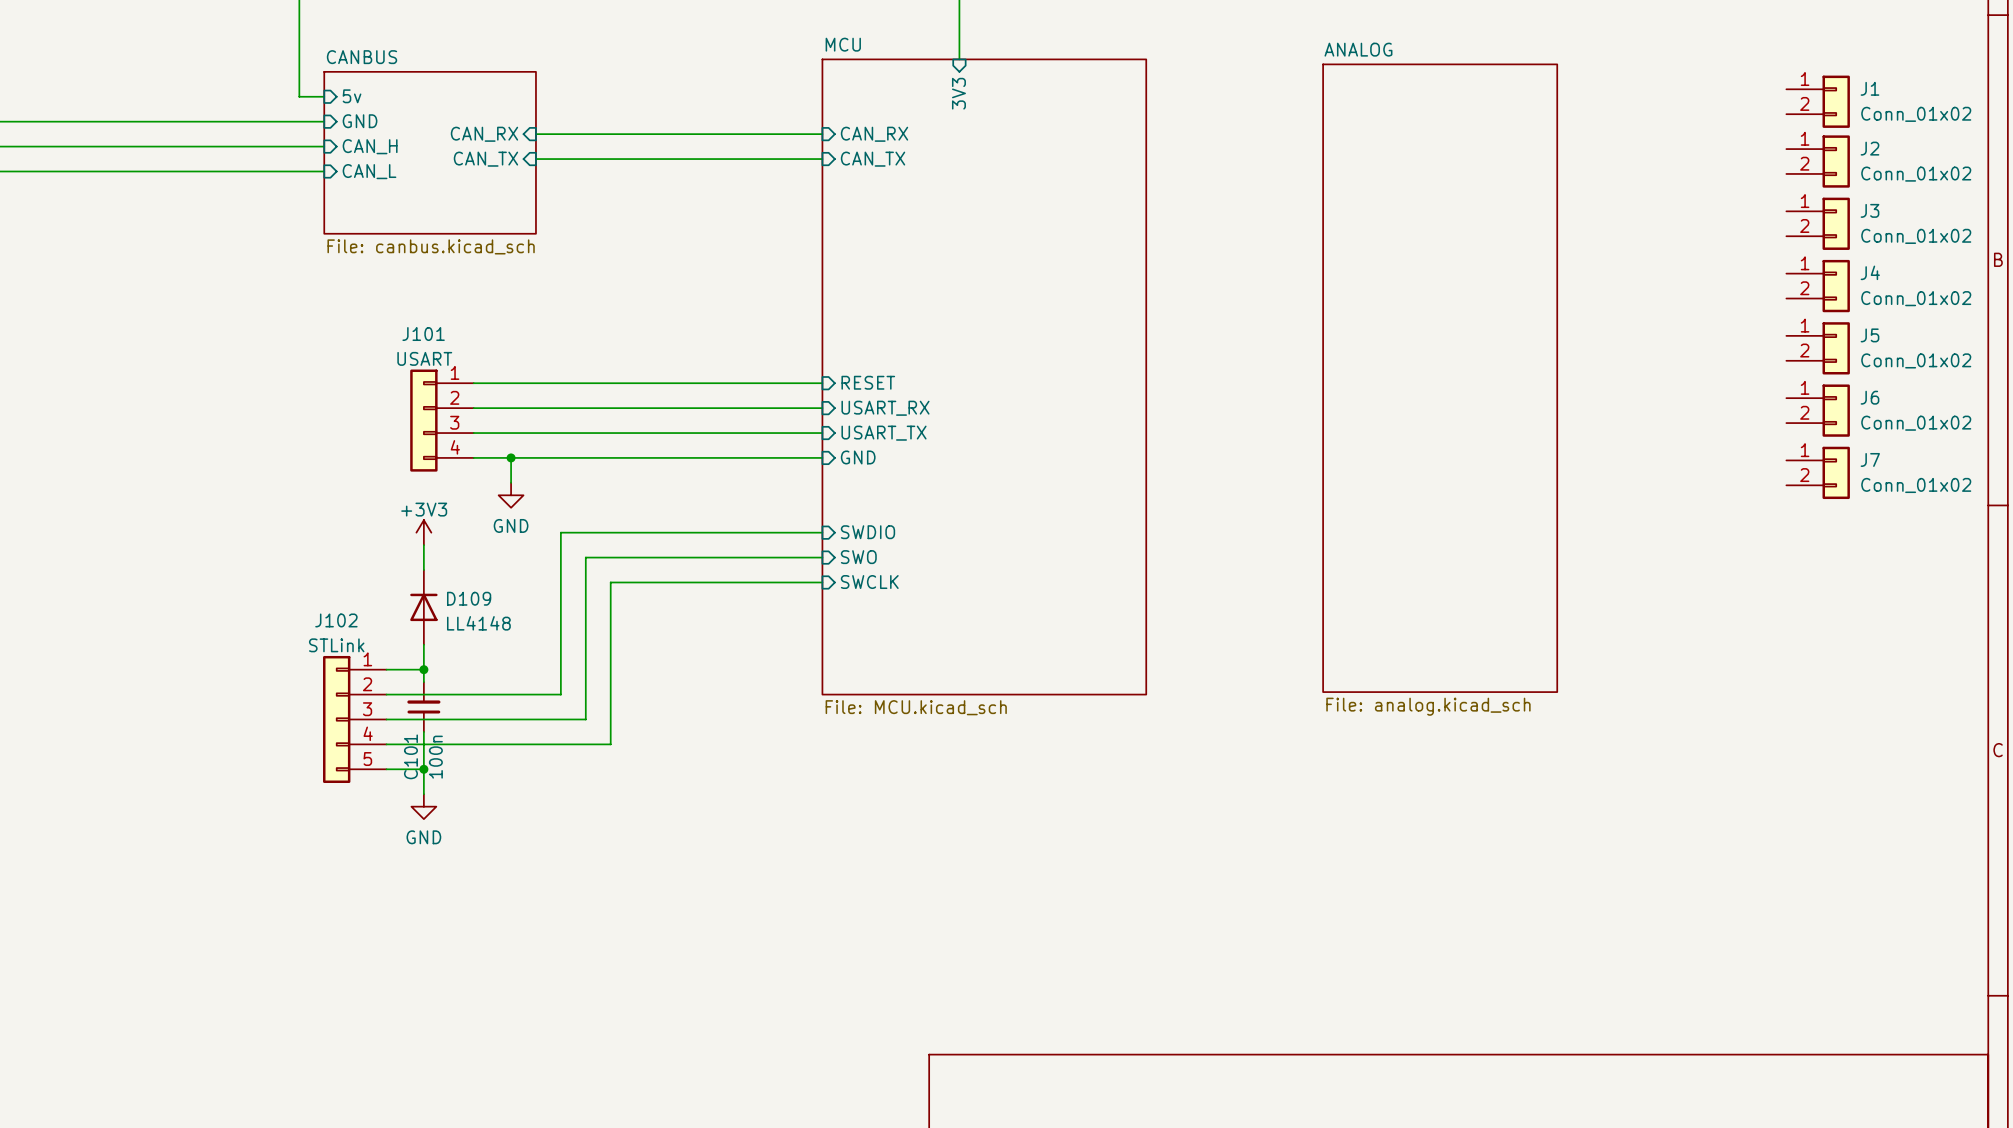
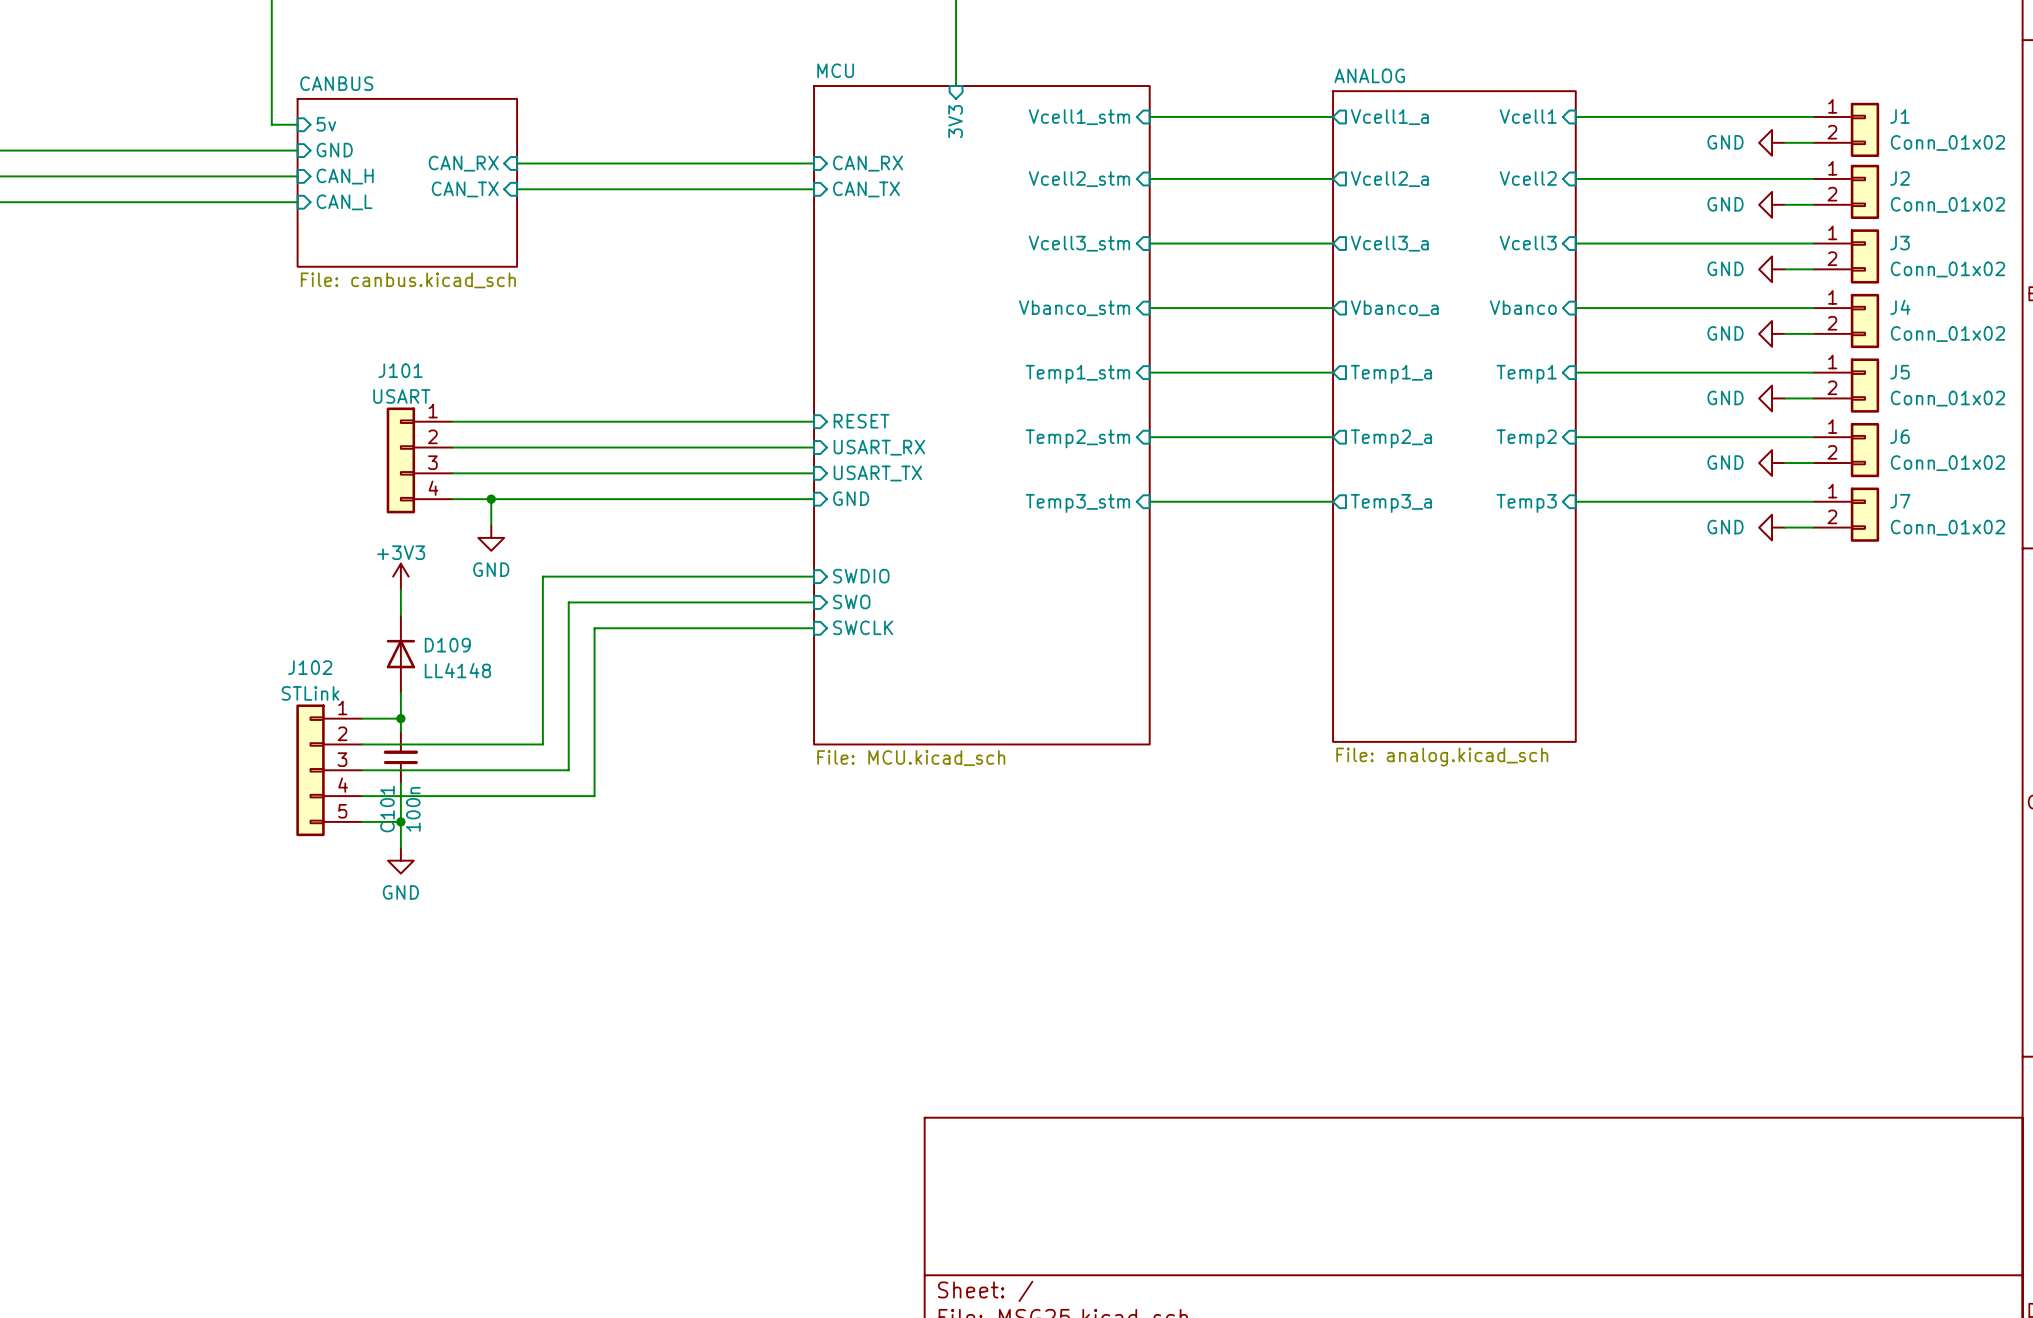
sheet pin: none -> Vcell1 (1528, 116)
sheet pin: none -> Vcell1_stm (1079, 117)
wire: none -> (1149, 117) (1333, 117)
sheet pin: none -> Vcell1_a (1389, 117)
wire: none -> (1575, 117) (1813, 117)
power symbol: none -> GND (1772, 142)
wire: none -> (1784, 142) (1813, 142)
sheet pin: none -> Vcell2 (1528, 178)
sheet pin: none -> Vcell2_stm (1079, 179)
wire: none -> (1149, 178) (1333, 178)
sheet pin: none -> Vcell2_a (1389, 179)
wire: none -> (1575, 178) (1813, 178)
power symbol: none -> GND (1772, 204)
wire: none -> (1784, 204) (1813, 204)
sheet pin: none -> Vcell3 (1528, 243)
sheet pin: none -> Vcell3_stm (1079, 243)
wire: none -> (1149, 243) (1333, 243)
sheet pin: none -> Vcell3_a (1389, 243)
wire: none -> (1575, 243) (1813, 243)
power symbol: none -> GND (1772, 269)
wire: none -> (1784, 269) (1813, 269)
sheet pin: none -> Vbanco_stm (1074, 308)
wire: none -> (1149, 308) (1333, 308)
sheet pin: none -> Vbanco_a (1394, 308)
sheet pin: none -> Vbanco (1523, 307)
wire: none -> (1575, 308) (1813, 308)
power symbol: none -> GND (1772, 333)
wire: none -> (1784, 333) (1813, 333)
wire: none -> (1149, 372) (1333, 372)
wire: none -> (1575, 372) (1813, 372)
sheet pin: none -> Temp1_stm (1077, 374)
sheet pin: none -> Temp1_a (1391, 374)
sheet pin: none -> Temp1 (1526, 374)
power symbol: none -> GND (1772, 398)
wire: none -> (1784, 398) (1813, 398)
wire: none -> (1149, 437) (1333, 437)
wire: none -> (1575, 437) (1813, 437)
sheet pin: none -> Temp2_stm (1077, 438)
sheet pin: none -> Temp2_a (1391, 438)
sheet pin: none -> Temp2 (1526, 438)
power symbol: none -> GND (1772, 463)
wire: none -> (1784, 463) (1813, 463)
wire: none -> (1149, 501) (1333, 501)
wire: none -> (1575, 501) (1813, 501)
sheet pin: none -> Temp3_stm (1077, 503)
sheet pin: none -> Temp3_a (1391, 503)
sheet pin: none -> Temp3 (1526, 503)
power symbol: none -> GND (1772, 527)
wire: none -> (1784, 527) (1813, 527)

